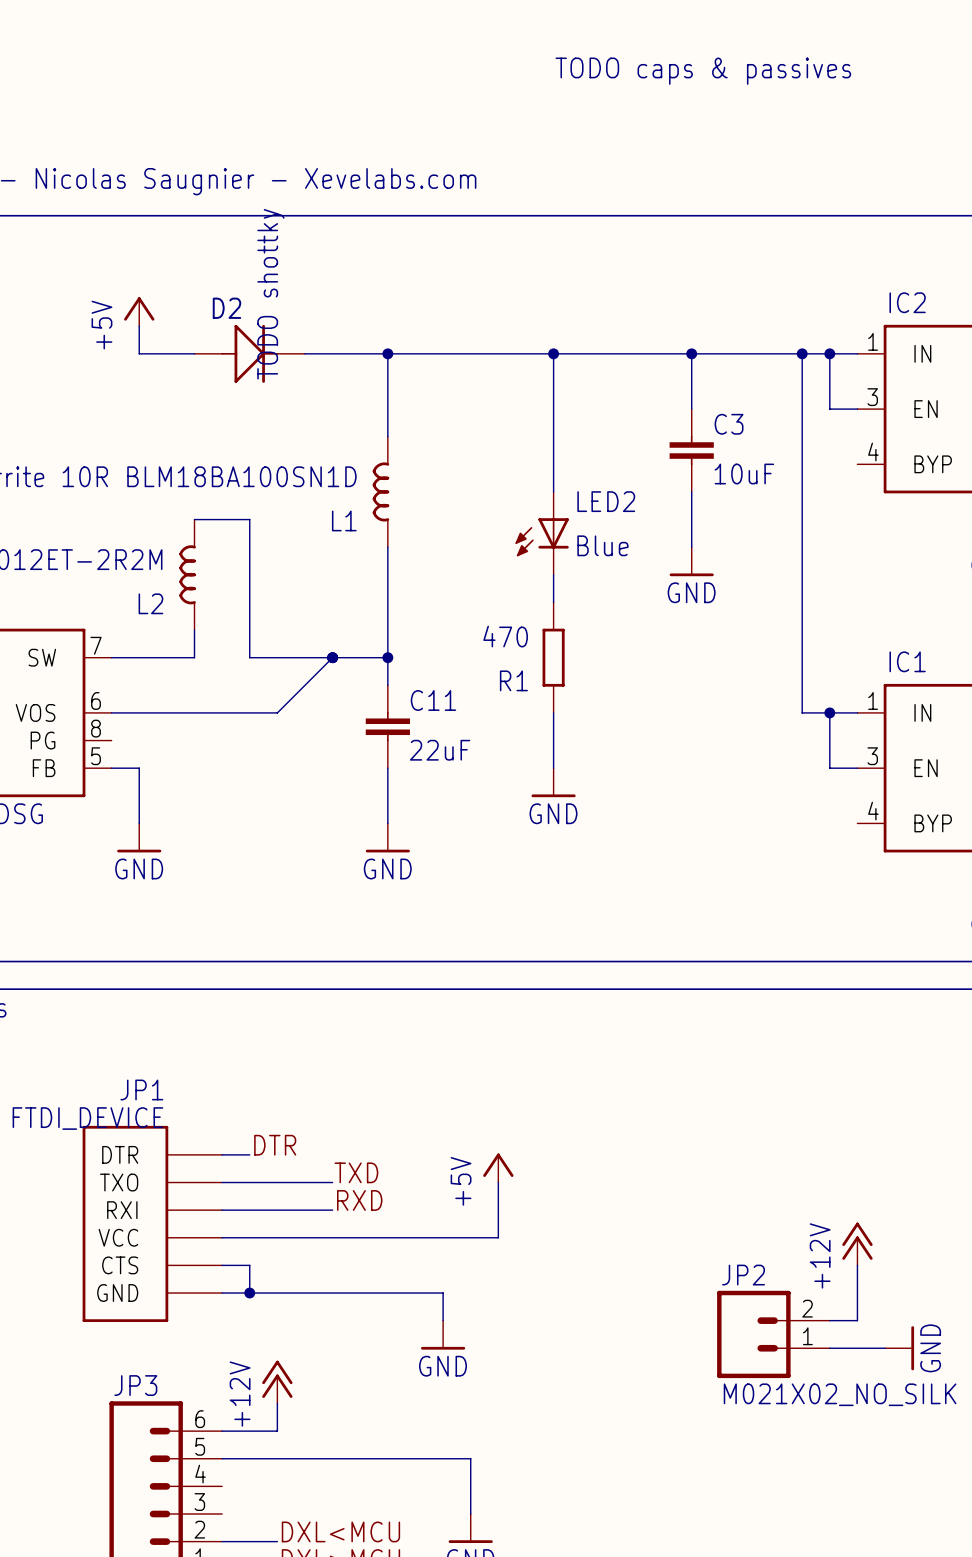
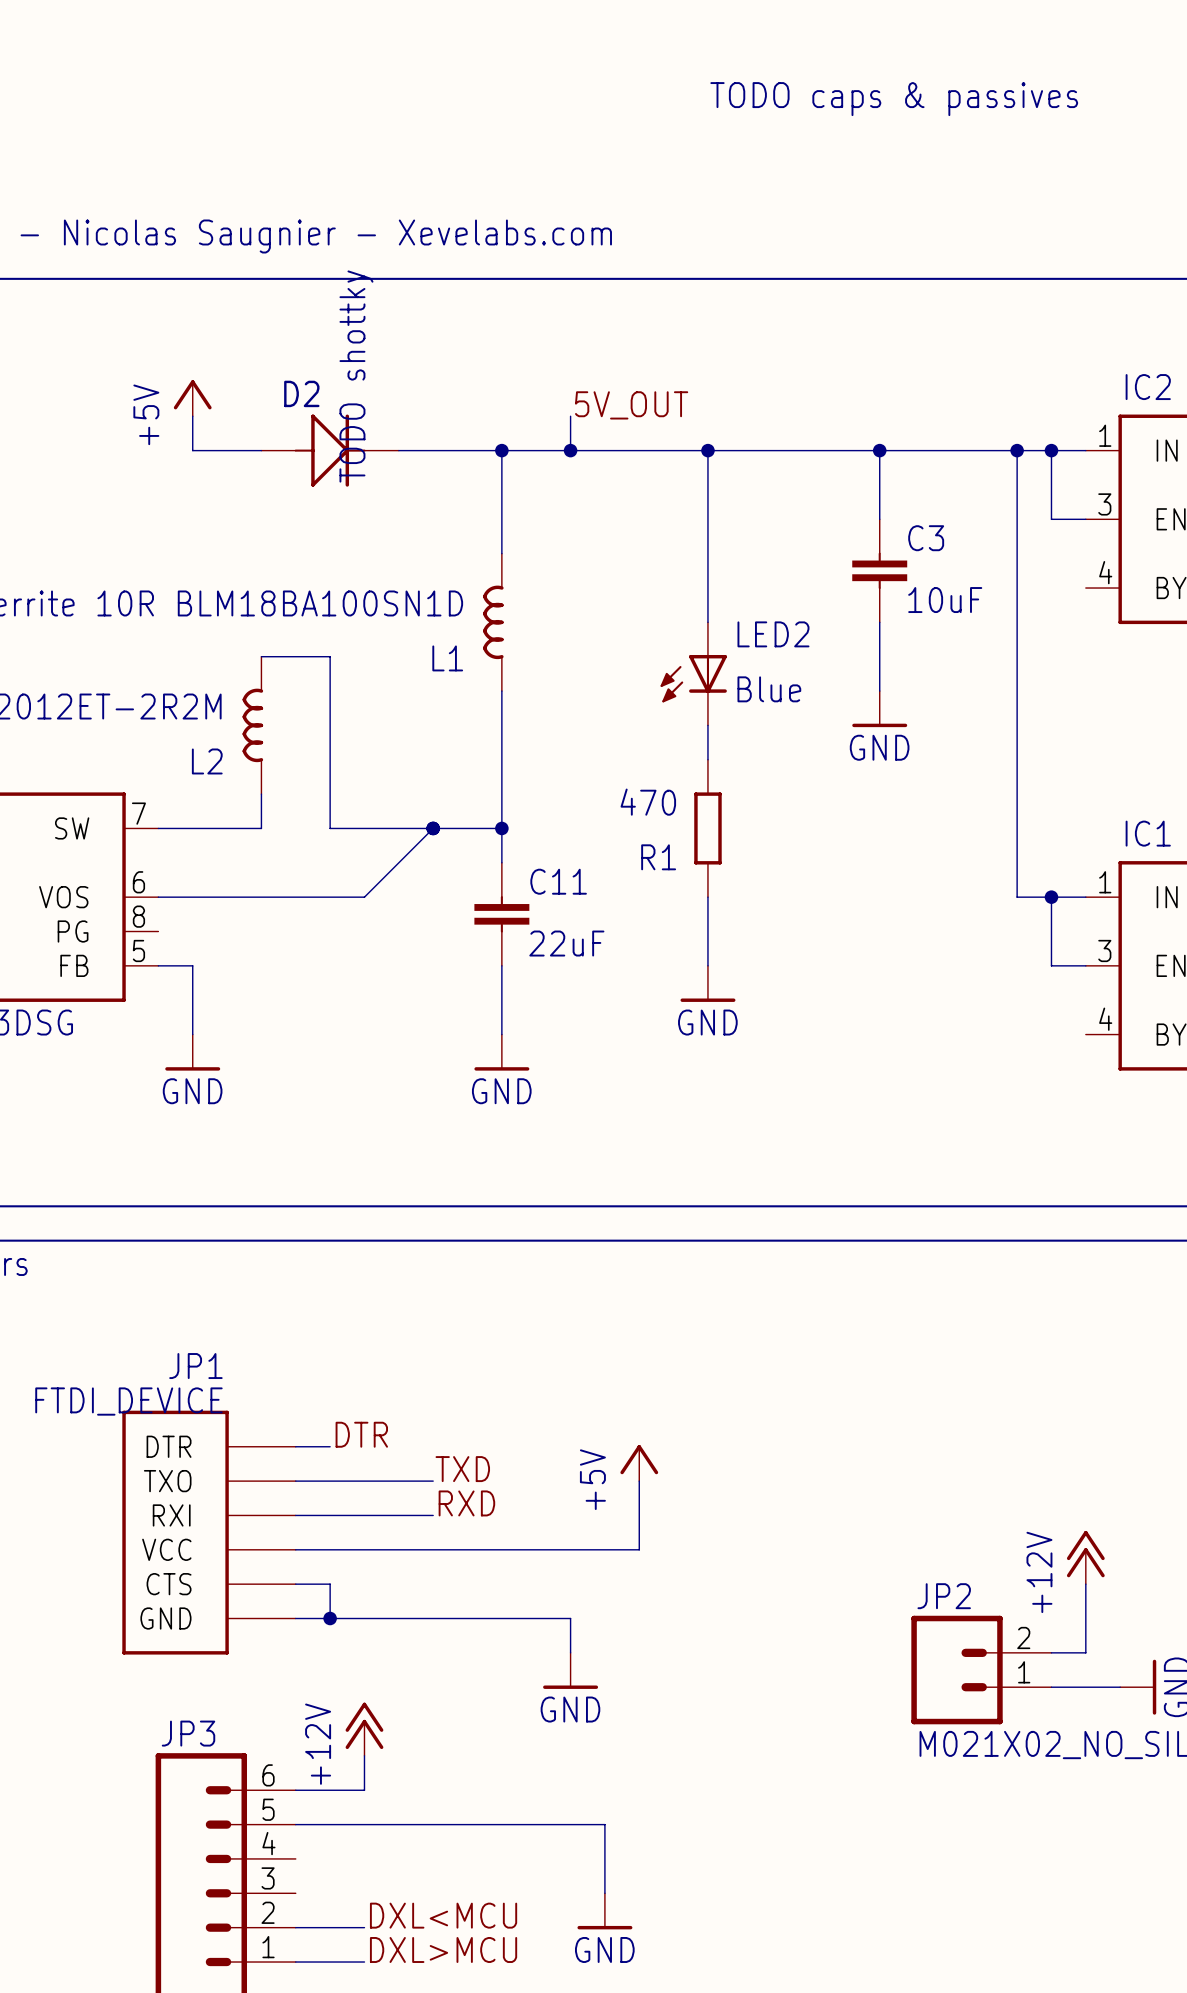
label: none -> 5V_OUT (631, 405)
wire: none -> (570, 416) (570, 450)
junction: none -> (570, 450)

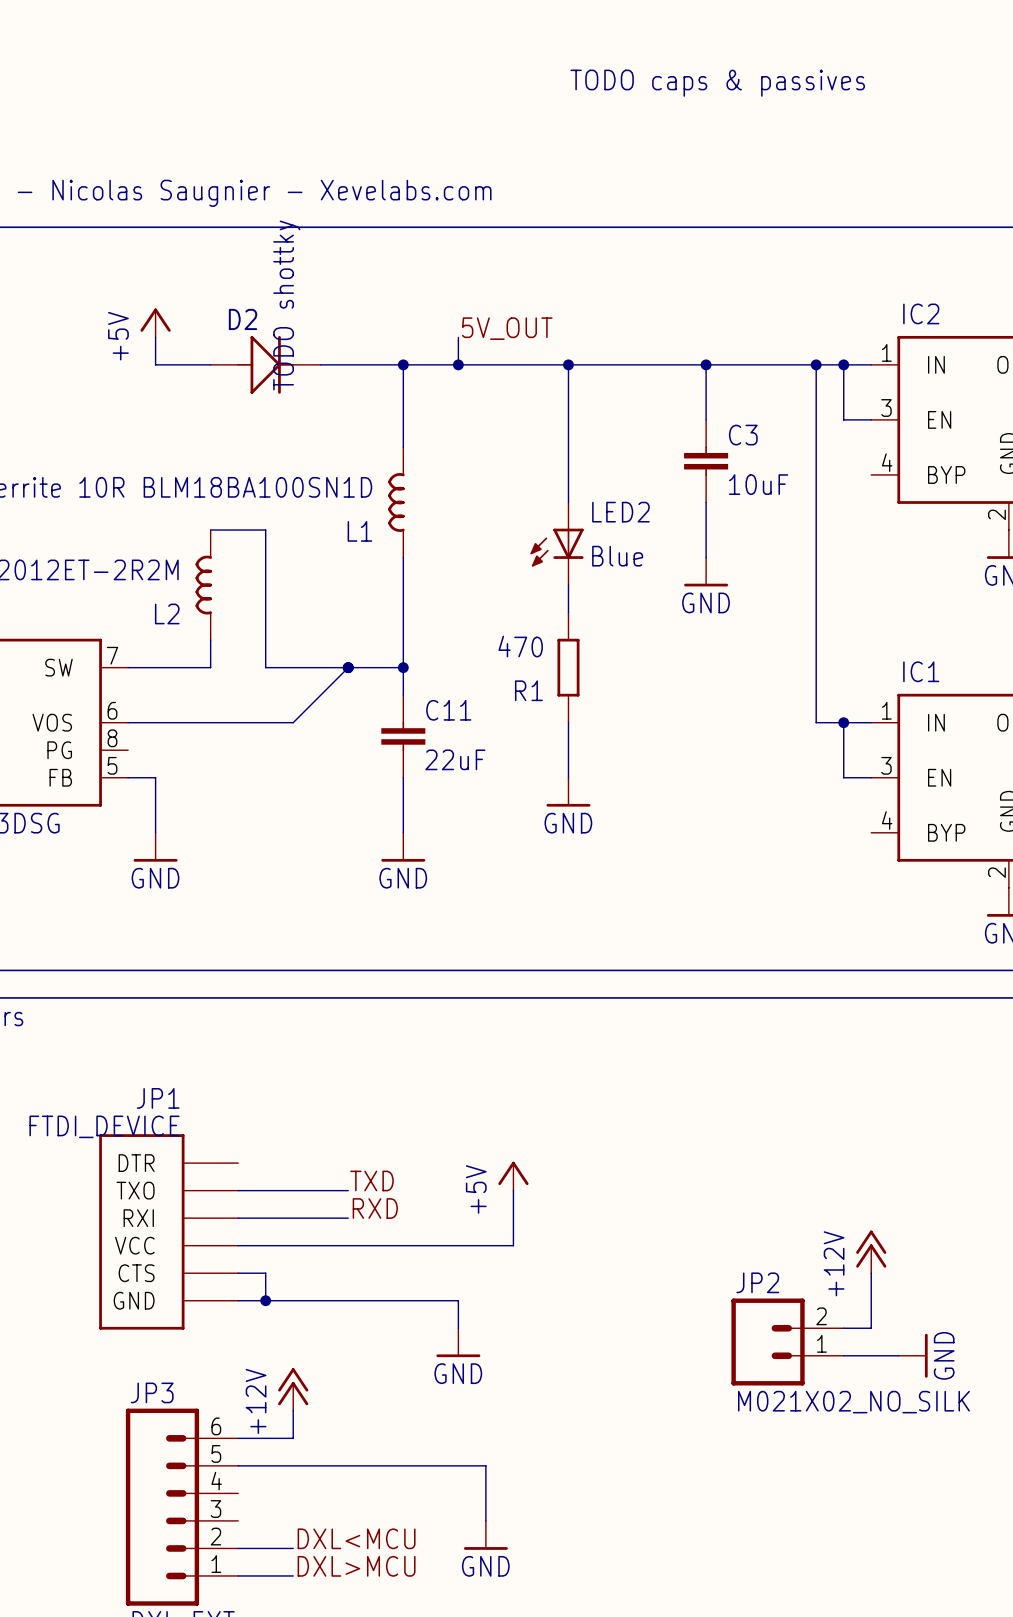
label: DTR (361, 1434) -> none
wire: (295, 1446) (330, 1446) -> none

